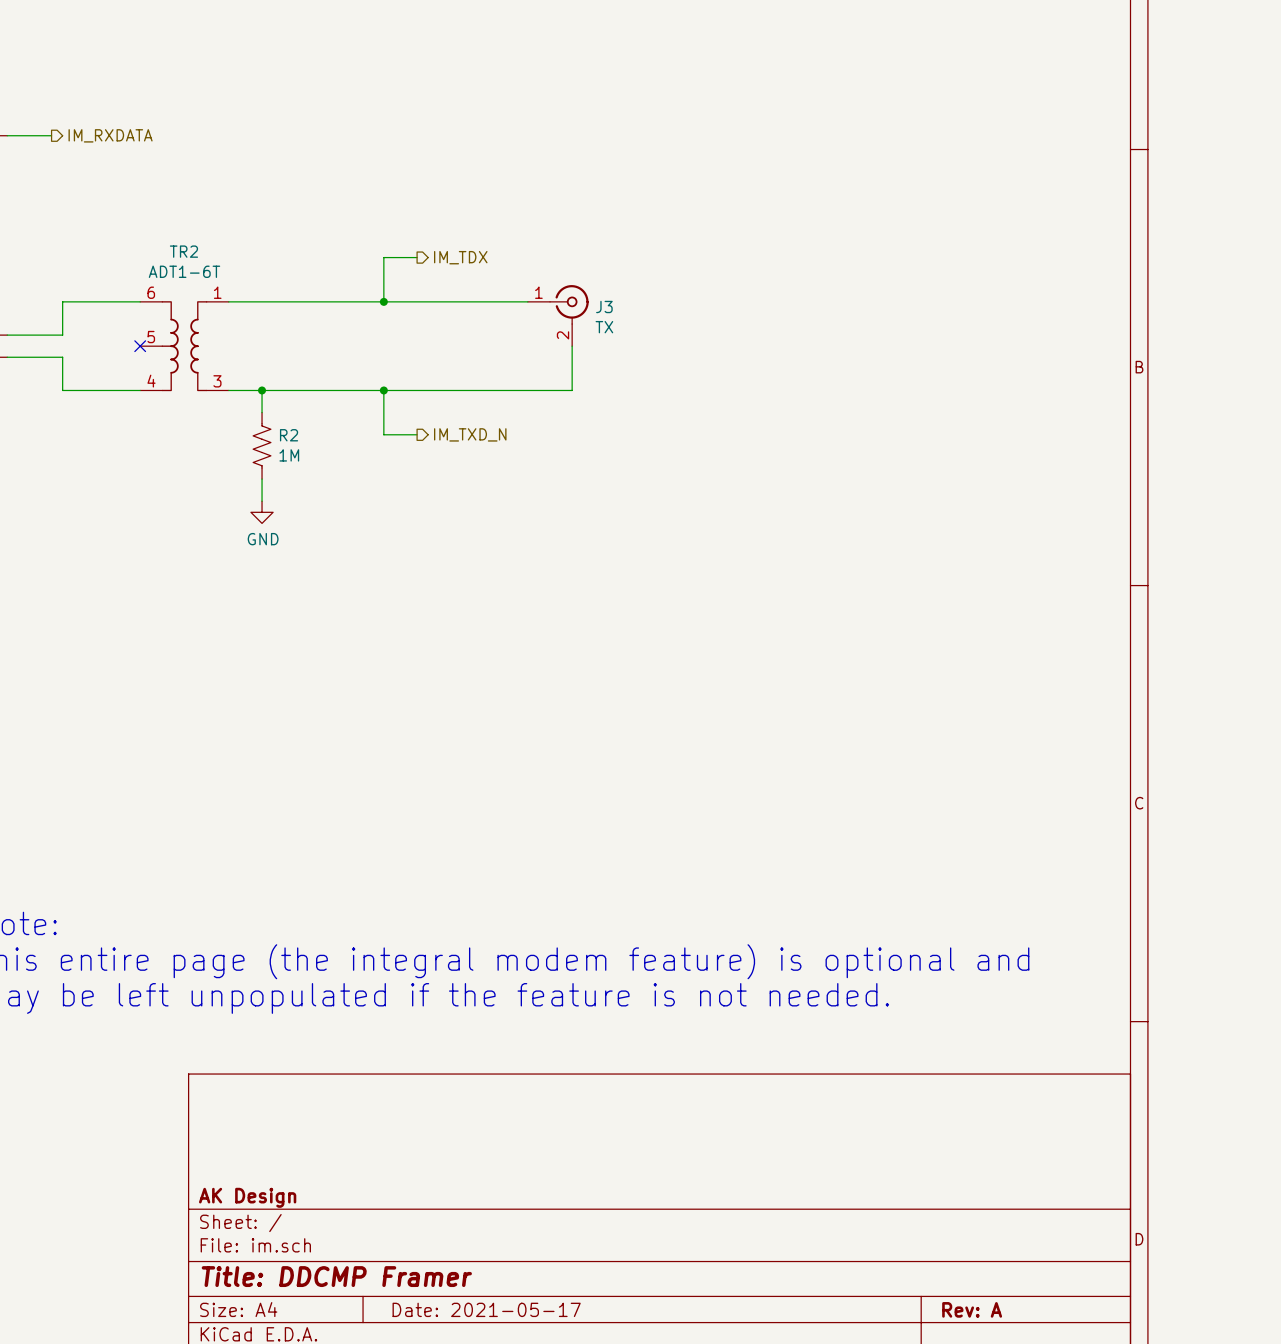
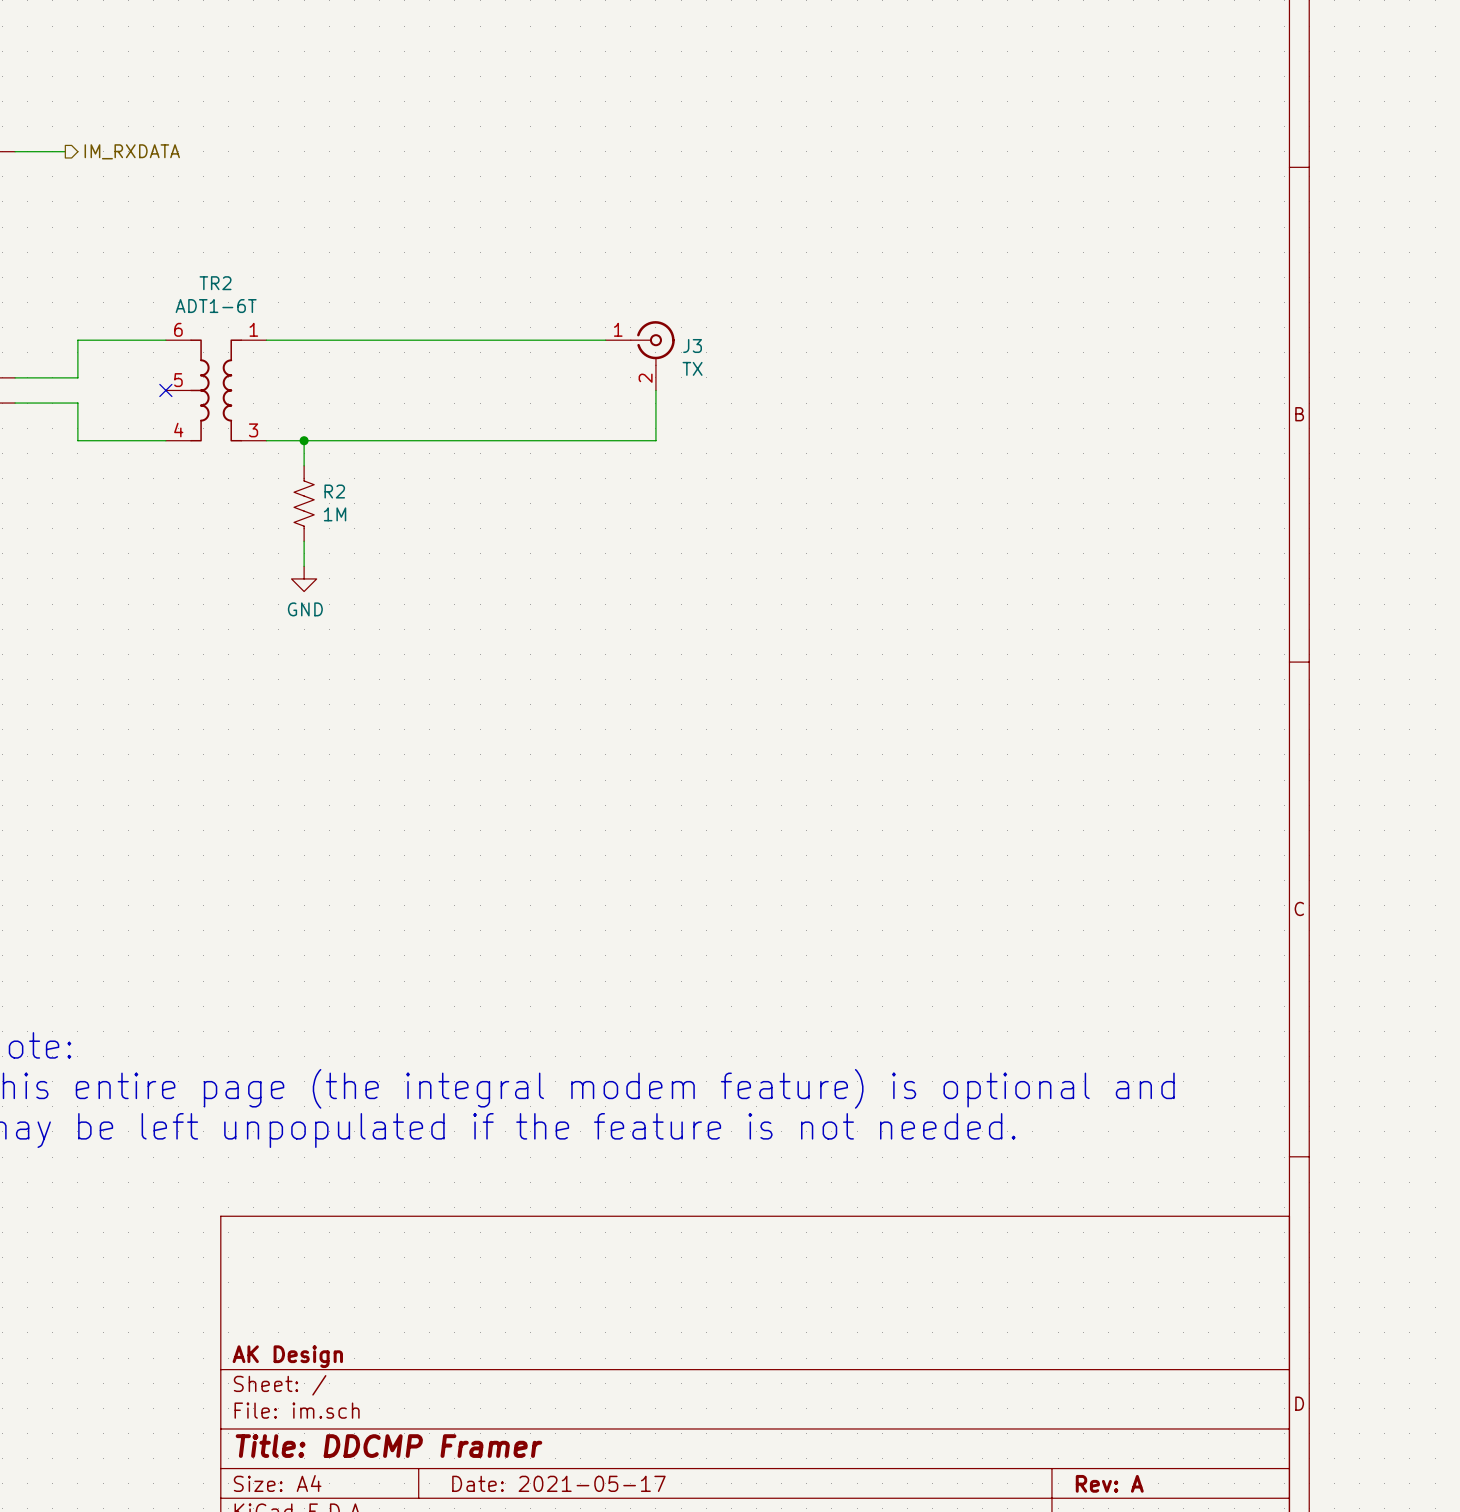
wire: (417, 257) (383, 257) (383, 301) -> none
hierarchical label: IM_TDX (460, 257) -> none
junction: (383, 301) -> none
wire: (383, 390) (383, 434) (417, 434) -> none
junction: (383, 390) -> none
hierarchical label: IM_TXD_N (470, 434) -> none

